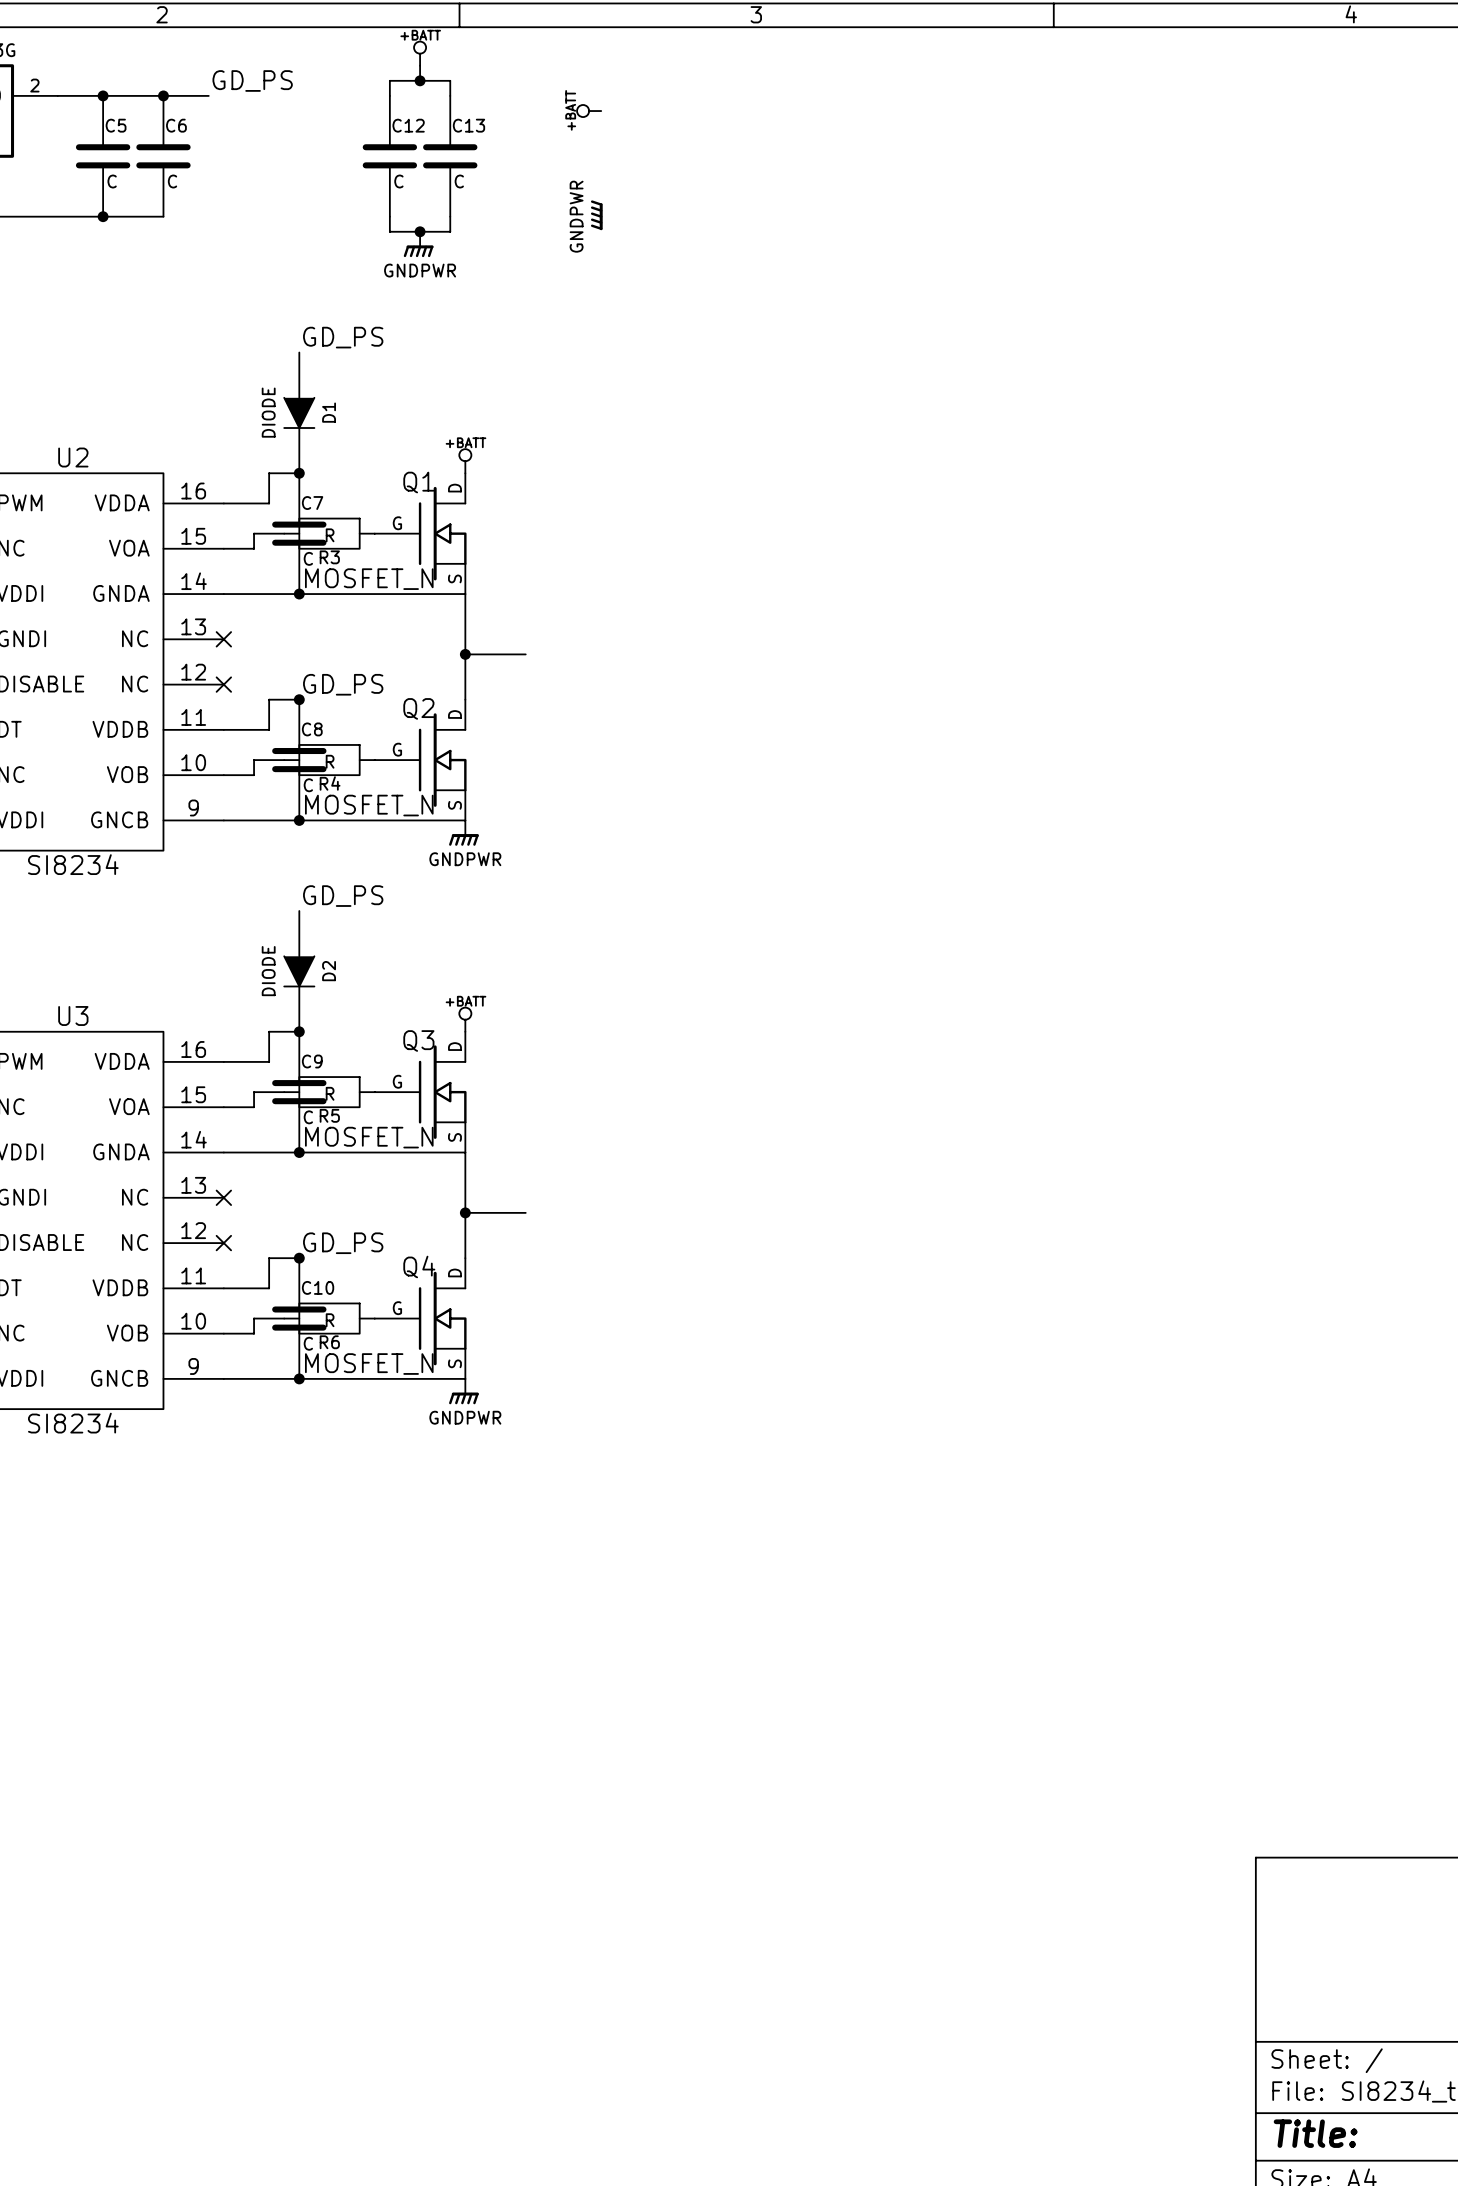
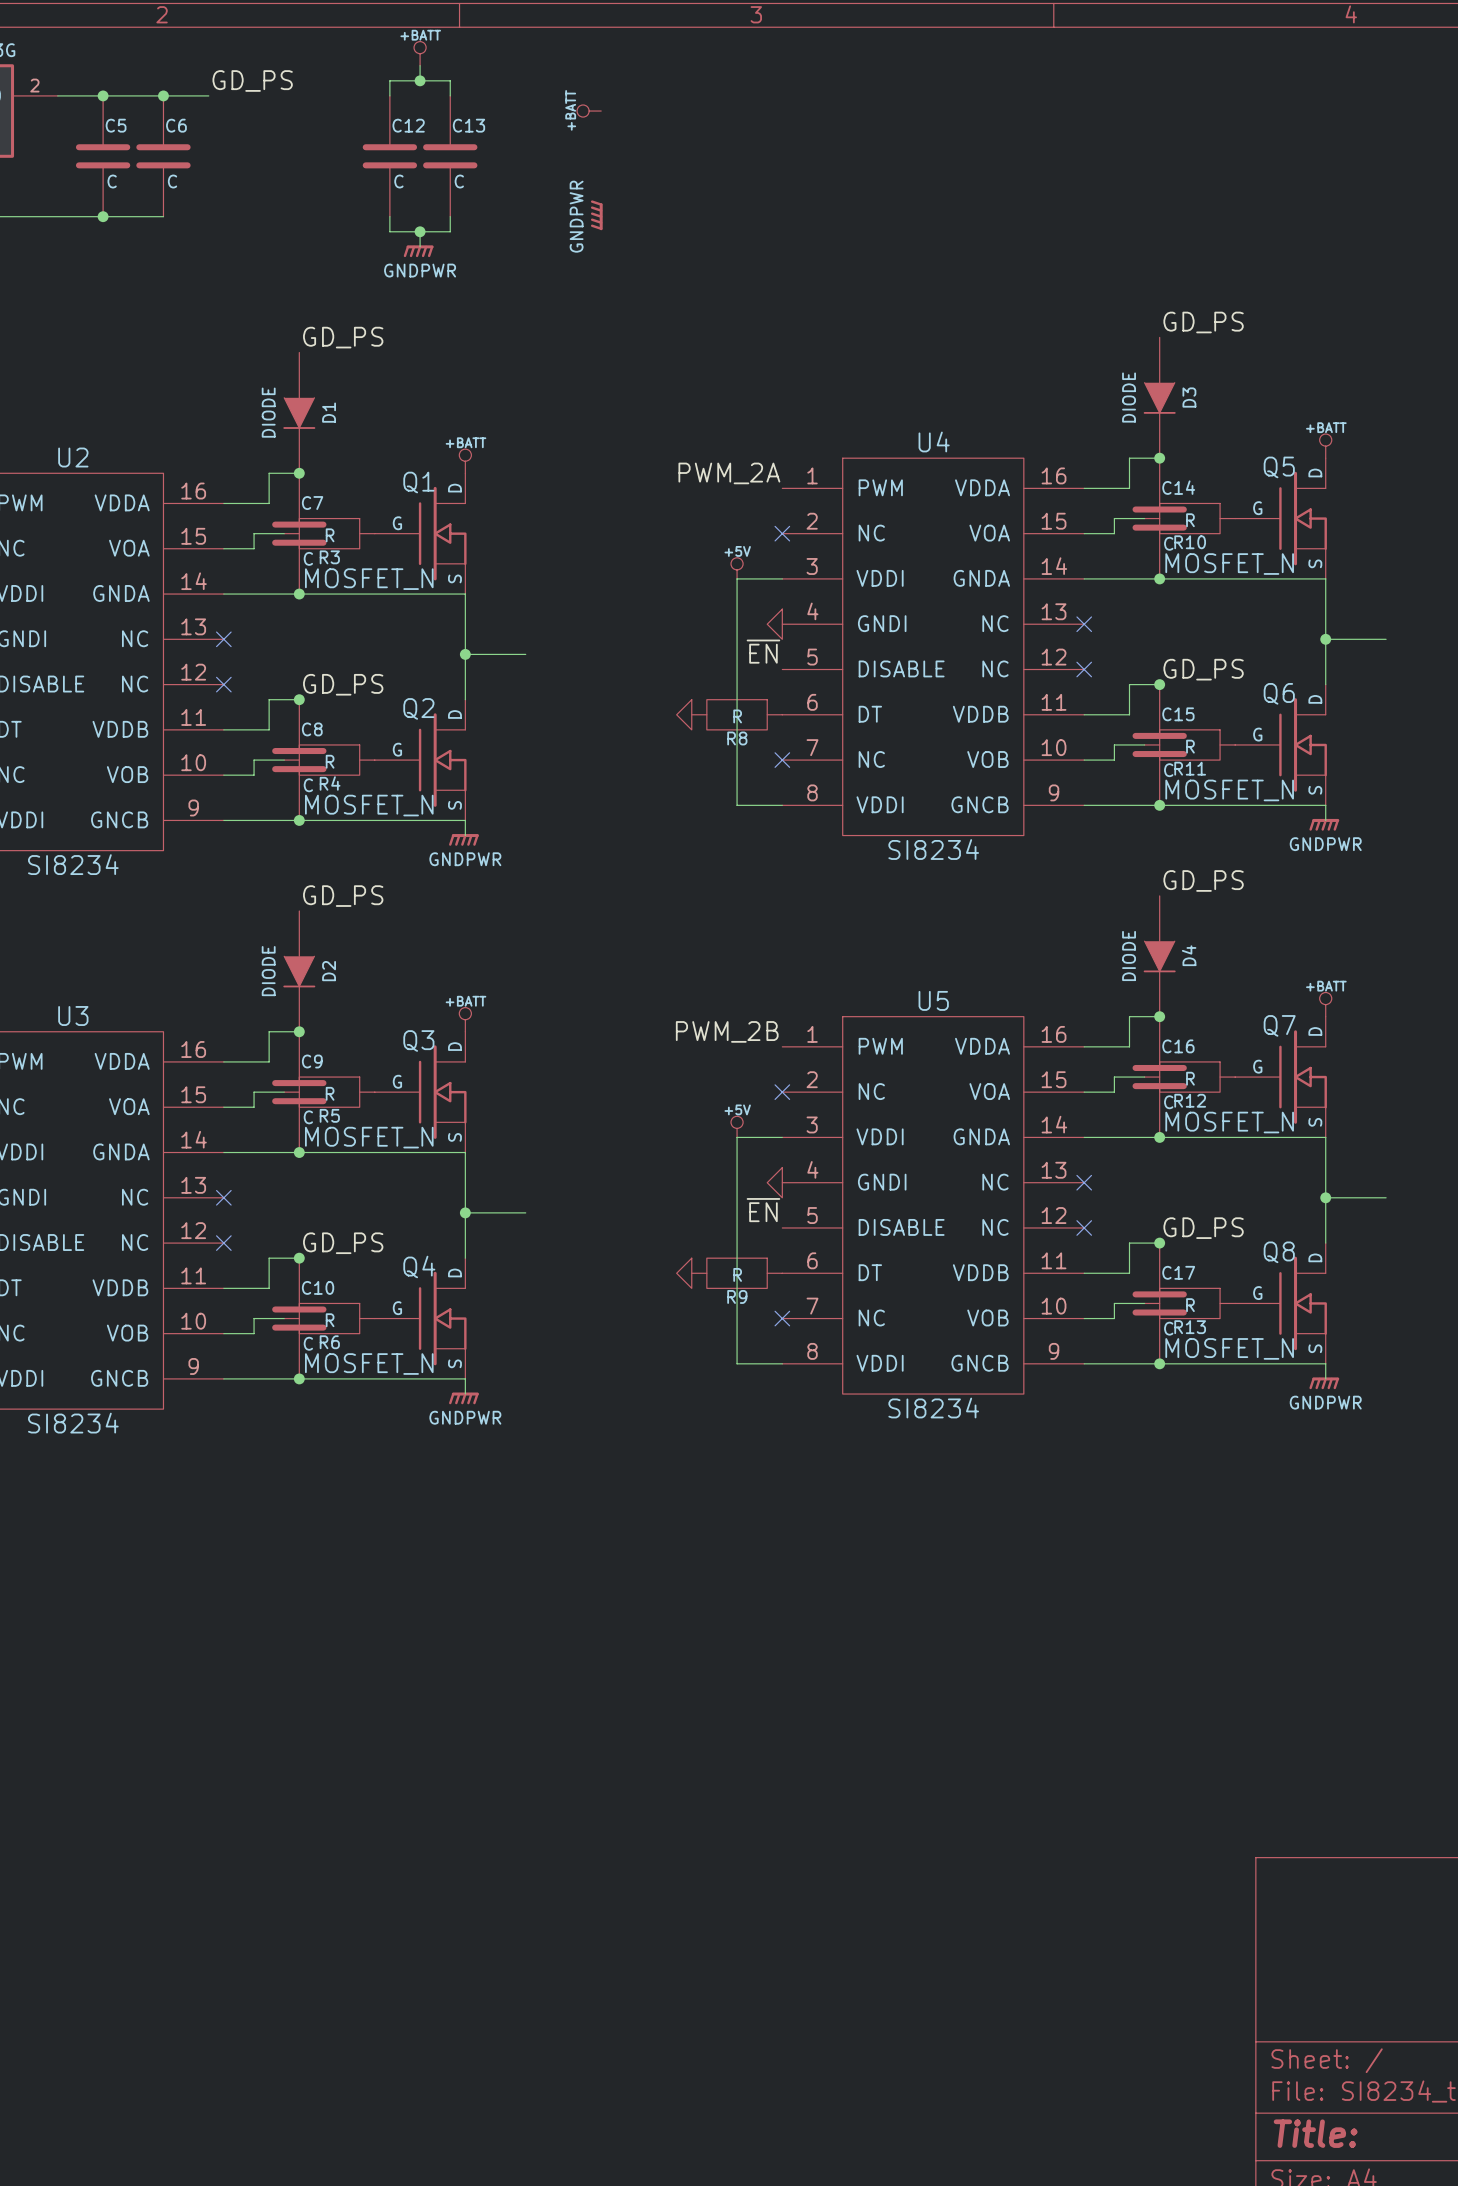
label: none -> GD_PS (1203, 322)
D3: none -> DIODE (1159, 397)
power symbol: none -> +BATT (1325, 446)
wire: none -> (1159, 458) (1129, 458) (1129, 488) (1084, 488)
junction: none -> (1159, 458)
label: none -> PWM_2A (729, 473)
wire: none -> (1144, 518) (1114, 518) (1114, 533) (1084, 533)
C14: none -> C (1159, 518)
R10: none -> R (1189, 518)
Q5: none -> MOSFET_N (1281, 518)
no-connect mark: none -> (782, 533)
power symbol: none -> +5V (737, 568)
wire: none -> (782, 578) (737, 578) (737, 805) (782, 805)
wire: none -> (1084, 578) (1325, 578) (1325, 684)
junction: none -> (1159, 578)
power symbol: none -> (774, 624)
no-connect mark: none -> (1084, 624)
wire: none -> (1325, 639) (1386, 639)
junction: none -> (1325, 639)
U4: none -> SI8234 (933, 646)
label: none -> ~{EN} (763, 651)
no-connect mark: none -> (1084, 669)
label: none -> GD_PS (1203, 669)
wire: none -> (1159, 684) (1129, 684) (1129, 714) (1084, 714)
junction: none -> (1159, 684)
power symbol: none -> (684, 714)
R8: none -> R (737, 714)
wire: none -> (1144, 744) (1114, 744) (1114, 760) (1084, 760)
C15: none -> C (1159, 744)
R11: none -> R (1189, 744)
Q6: none -> MOSFET_N (1281, 744)
no-connect mark: none -> (782, 760)
wire: none -> (1084, 805) (1325, 805) (1325, 820)
junction: none -> (1159, 805)
power symbol: none -> GNDPWR (1324, 824)
label: none -> GD_PS (1203, 880)
D4: none -> DIODE (1159, 956)
power symbol: none -> +BATT (1325, 1004)
wire: none -> (1159, 1016) (1129, 1016) (1129, 1046) (1084, 1046)
junction: none -> (1159, 1016)
label: none -> PWM_2B (727, 1031)
wire: none -> (1144, 1077) (1114, 1077) (1114, 1092) (1084, 1092)
C16: none -> C (1159, 1077)
R12: none -> R (1189, 1077)
Q7: none -> MOSFET_N (1281, 1077)
no-connect mark: none -> (782, 1092)
power symbol: none -> +5V (737, 1126)
wire: none -> (782, 1137) (737, 1137) (737, 1363) (782, 1363)
wire: none -> (1084, 1137) (1325, 1137) (1325, 1243)
junction: none -> (1159, 1137)
power symbol: none -> (774, 1182)
no-connect mark: none -> (1084, 1182)
wire: none -> (1325, 1197) (1386, 1197)
junction: none -> (1325, 1197)
U5: none -> SI8234 (933, 1205)
label: none -> ~{EN} (763, 1210)
no-connect mark: none -> (1084, 1227)
label: none -> GD_PS (1203, 1228)
wire: none -> (1159, 1243) (1129, 1243) (1129, 1273) (1084, 1273)
junction: none -> (1159, 1243)
power symbol: none -> (684, 1273)
R9: none -> R (737, 1273)
wire: none -> (1144, 1303) (1114, 1303) (1114, 1318) (1084, 1318)
C17: none -> C (1159, 1303)
R13: none -> R (1189, 1303)
Q8: none -> MOSFET_N (1281, 1303)
no-connect mark: none -> (782, 1318)
wire: none -> (1084, 1363) (1325, 1363) (1325, 1378)
junction: none -> (1159, 1363)
power symbol: none -> GNDPWR (1324, 1383)

